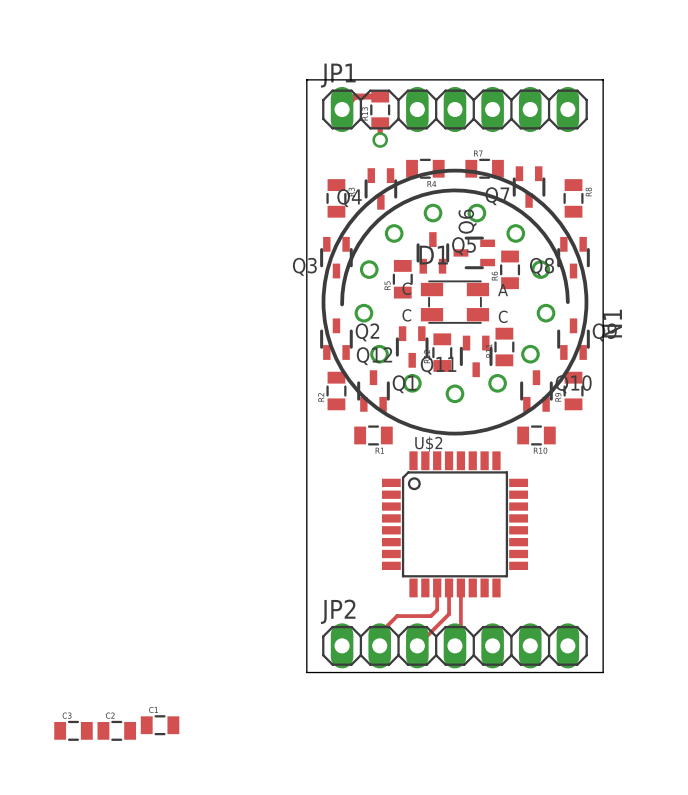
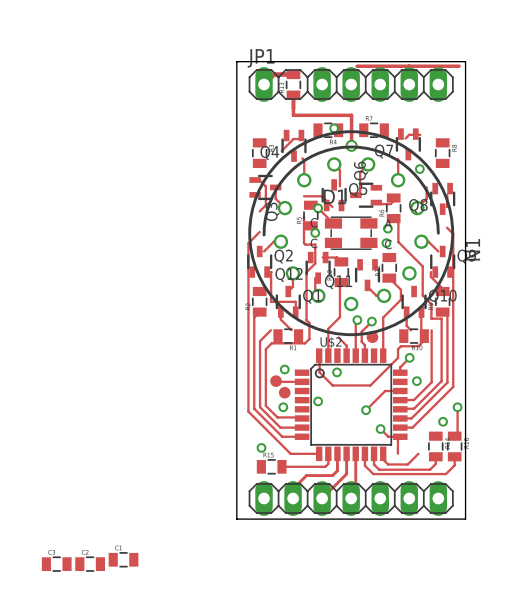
track: none -> (357, 66) (459, 66)
track: none -> (293, 108) (293, 115) (351, 115) (351, 145)
via: (380, 140) -> none
via: none -> (334, 128)
track: none -> (420, 134) (409, 134) (405, 138)
track: none -> (302, 138) (293, 138) (281, 150)
via: none -> (351, 145)
track: none -> (302, 158) (304, 160) (304, 180)
track: none -> (398, 159) (398, 180)
track: none -> (334, 164) (339, 170) (339, 186)
track: none -> (368, 164) (360, 172) (360, 196)
via: none -> (419, 169)
track: none -> (255, 180) (259, 180) (265, 186) (265, 205) (259, 211)
track: none -> (275, 187) (275, 198) (284, 208)
track: none -> (426, 187) (426, 198) (417, 208)
track: none -> (447, 194) (447, 207)
track: none -> (303, 196) (321, 196) (332, 206)
track: none -> (398, 196) (390, 204) (380, 204)
Q3 rotation: 0° (336, 257) -> 90° counterclockwise (265, 187)
track: none -> (318, 208) (333, 223)
via: none -> (318, 208)
track: none -> (303, 216) (303, 243) (315, 244) (315, 263) (306, 272) (306, 320) (309, 323) (309, 339) (305, 343) (271, 343) (265, 349) (265, 405) (277, 417) (302, 418)
track: none -> (398, 216) (398, 242) (422, 266) (422, 295) (431, 304) (431, 318) (441, 318) (441, 381) (414, 408) (400, 409)
track: none -> (447, 227) (453, 233) (453, 386) (412, 427) (400, 427)
via: none -> (387, 228)
track: none -> (259, 232) (248, 243) (248, 411) (290, 453) (319, 453)
via: none -> (315, 232)
track: none -> (280, 241) (273, 241) (264, 251)
track: none -> (421, 241) (428, 241) (438, 251)
via: none -> (386, 243)
track: none -> (322, 257) (337, 257) (339, 260)
track: none -> (271, 272) (271, 301) (295, 301) (295, 312)
track: none -> (430, 272) (430, 276) (442, 288)
track: none -> (292, 273) (292, 286) (288, 291)
track: none -> (315, 278) (315, 292) (318, 295)
track: none -> (389, 278) (400, 289) (400, 299) (383, 317) (383, 355)
track: none -> (339, 281) (339, 317) (328, 328) (328, 355)
track: none -> (366, 285) (376, 295) (384, 295)
track: none -> (259, 309) (259, 312) (254, 317) (254, 408) (282, 436) (302, 436)
track: none -> (442, 309) (447, 313) (447, 382) (411, 418) (400, 418)
track: none -> (280, 312) (280, 319) (291, 330)
track: none -> (406, 312) (406, 325) (411, 330)
track: none -> (421, 312) (421, 343) (418, 346) (400, 346) (398, 349) (398, 357) (370, 385) (332, 385) (319, 372) (319, 355)
track: none -> (357, 320) (355, 321) (355, 355)
via: none -> (357, 320)
track: none -> (371, 321) (361, 331) (364, 355)
via: none -> (371, 321)
track: none -> (270, 330) (260, 341) (260, 407) (280, 427) (302, 427)
track: none -> (431, 330) (431, 382) (414, 400) (400, 400)
part: none -> (372, 337)
track: none -> (338, 337) (346, 345) (346, 355)
track: none -> (409, 357) (400, 367) (400, 372)
via: none -> (409, 357)
via: none -> (284, 369)
via: none -> (337, 372)
track: none -> (276, 381) (302, 381)
part: none -> (276, 381)
via: none -> (416, 381)
track: none -> (400, 391) (385, 391) (366, 410)
part: none -> (284, 392)
via: none -> (318, 401)
via: none -> (283, 407)
track: none -> (457, 407) (457, 433) (454, 436)
via: none -> (457, 407)
via: none -> (366, 410)
via: none -> (443, 421)
track: none -> (380, 429) (388, 436) (400, 436) (397, 439) (397, 453)
via: none -> (380, 429)
part: none -> (435, 446)
part: none -> (454, 446)
via: none -> (261, 447)
track: none -> (328, 453) (328, 463) (325, 466) (281, 466)
track: none -> (364, 453) (364, 465) (373, 474) (445, 474) (454, 465) (454, 456)
track: none -> (374, 453) (374, 464) (379, 469) (429, 469) (435, 463) (435, 456)
track: none -> (383, 453) (383, 459) (388, 464) (407, 464) (418, 453)
part: none -> (271, 466)
JP2 name: JP2 (338, 611) -> none

